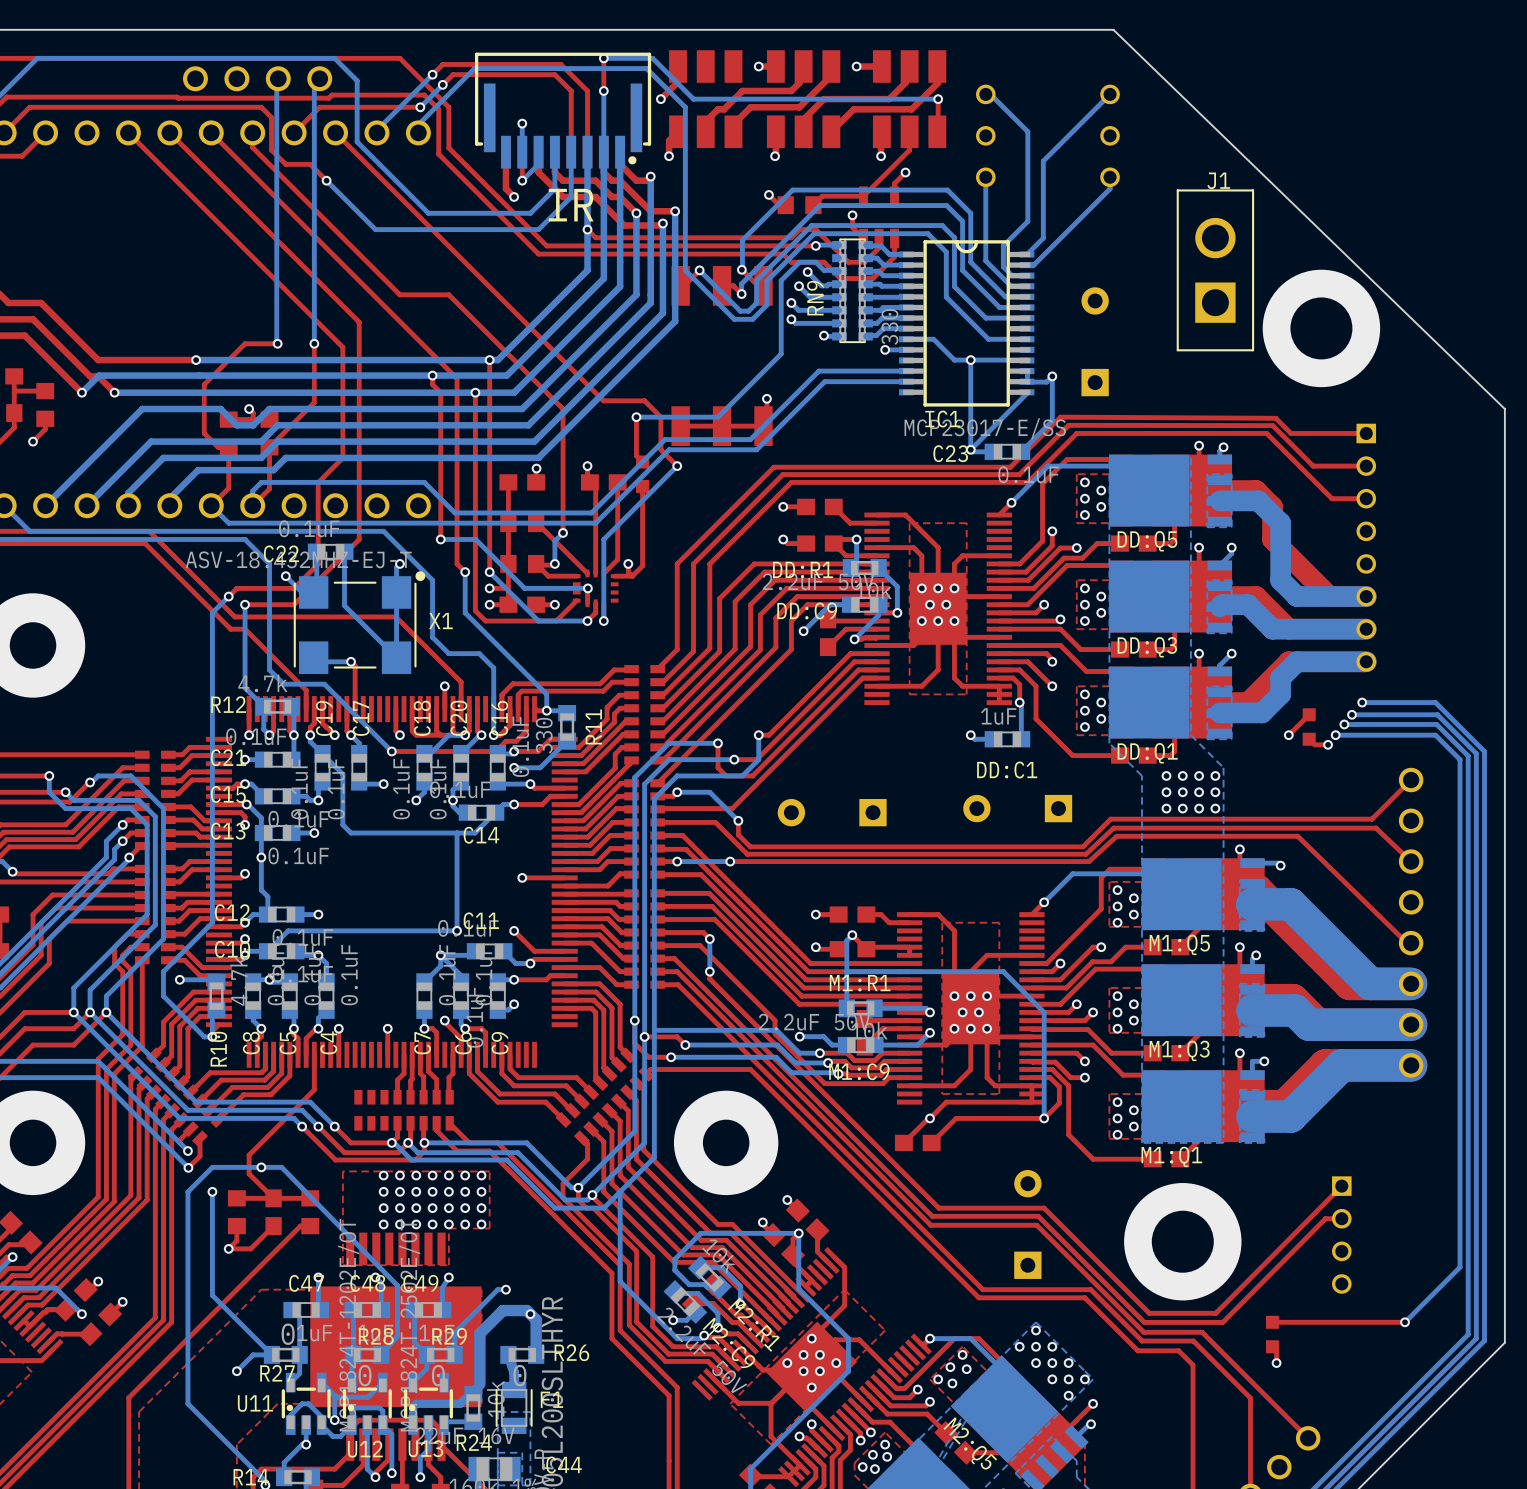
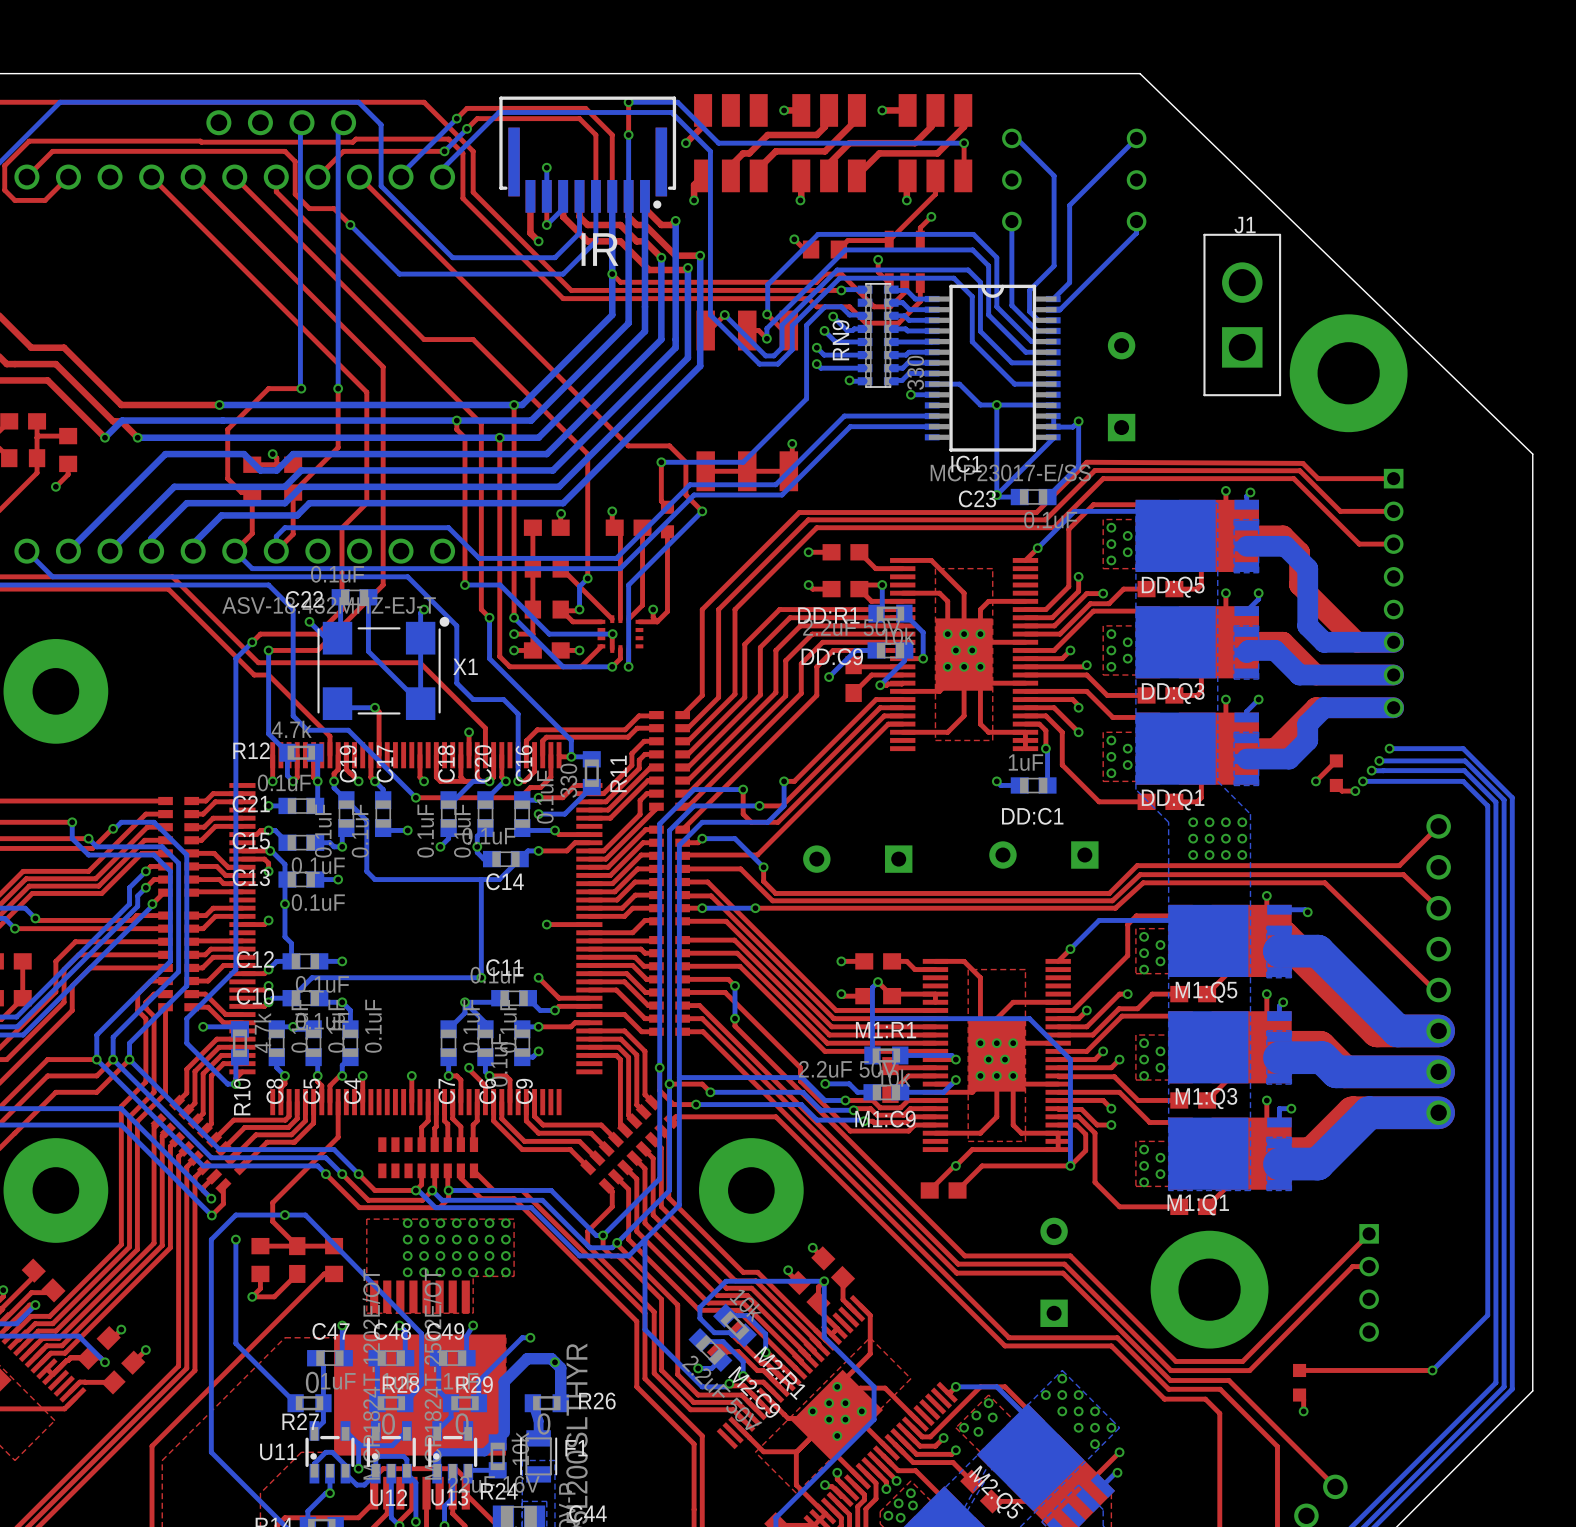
bottom track: (271, 1354) (253, 1354) (236, 1371) -> none
via: (236, 1371) -> none

